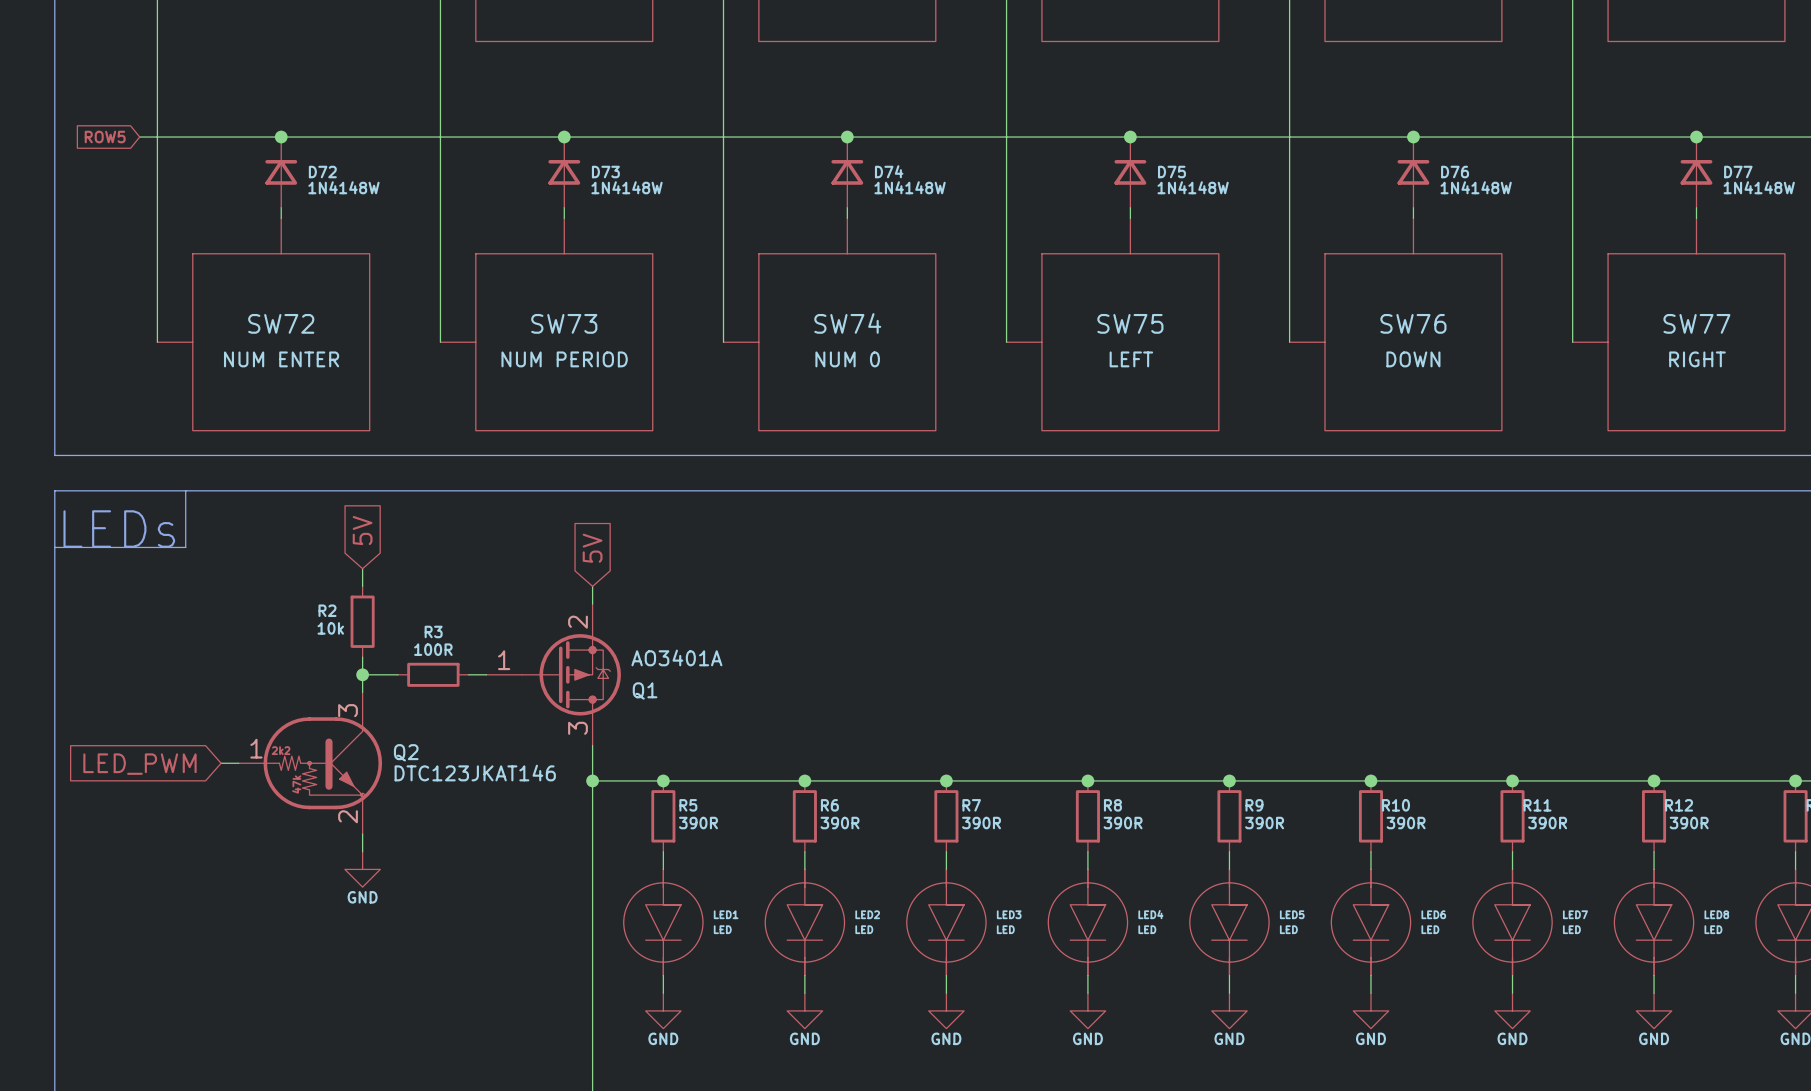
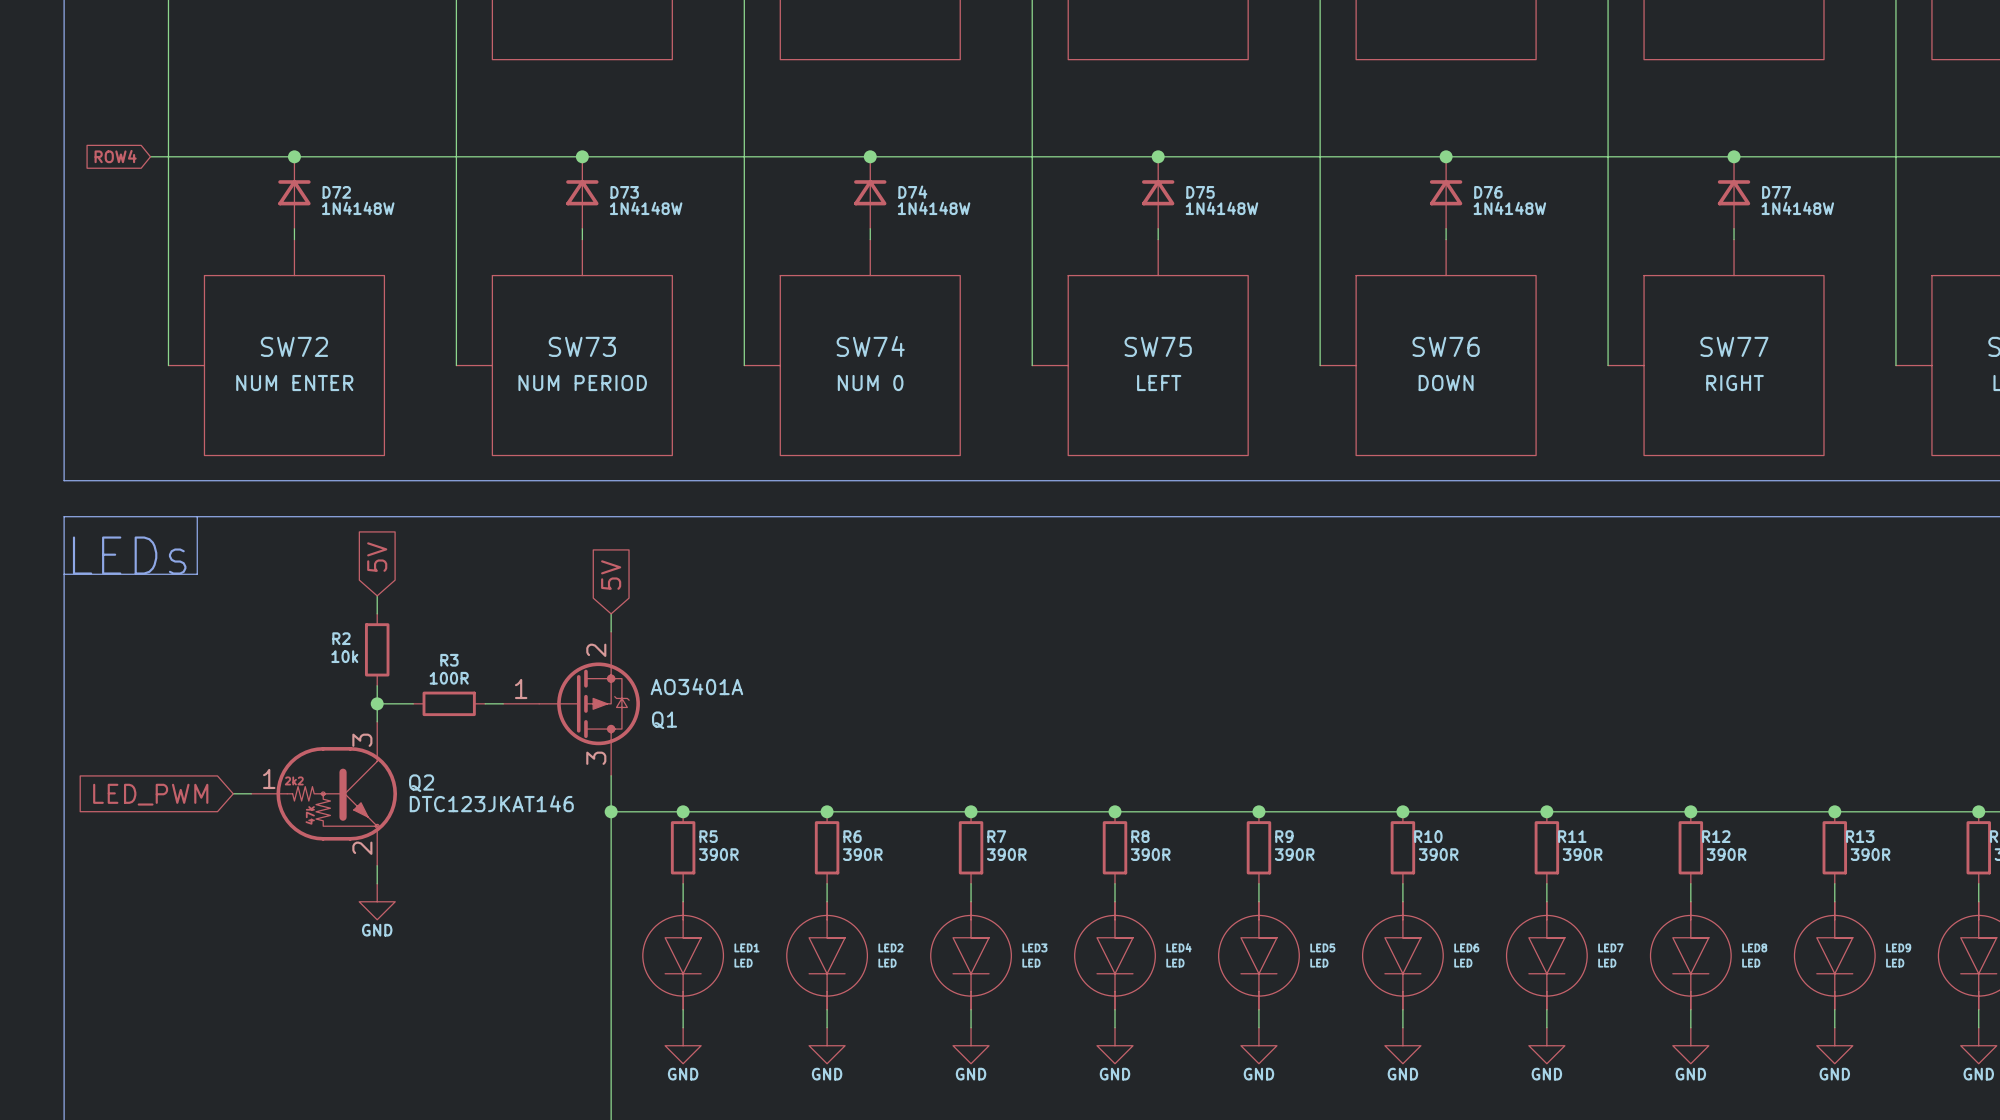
global label: ROW5 (105, 137) -> ROW4 (115, 156)

